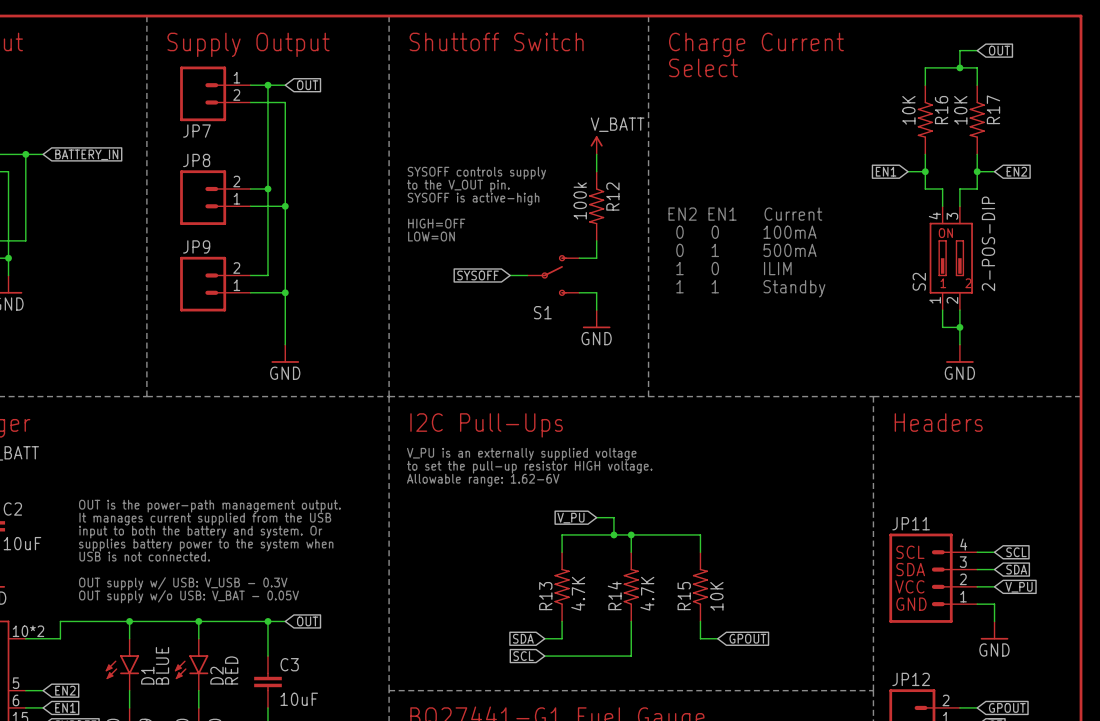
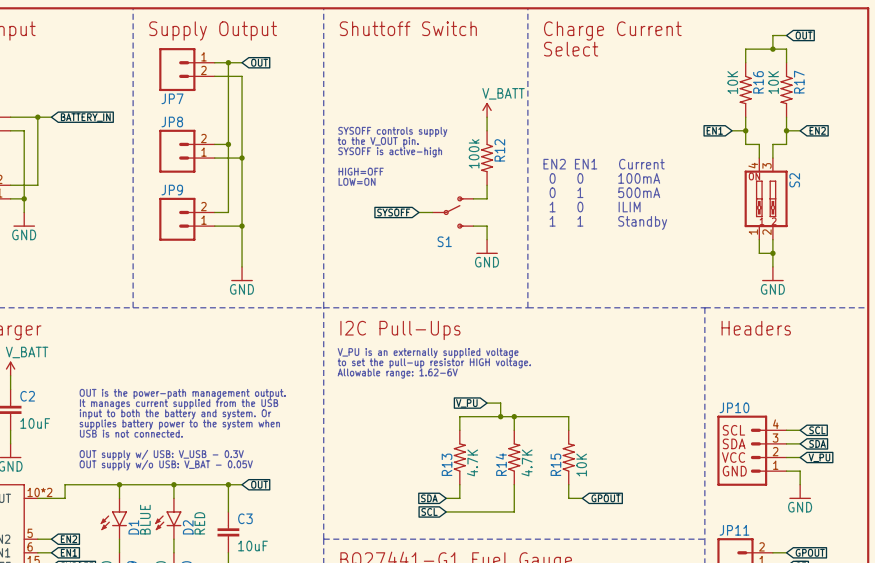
S2 symbol: [929, 206, 973, 311] -> [744, 158, 788, 240]
S2 value: 2-POS-DIP (988, 243) -> none
S2 name position: S2 (919, 281) -> S2 (794, 180)
JP11 name: JP11 (911, 523) -> JP10 (734, 407)
JP12 name: JP12 (911, 679) -> JP11 (734, 530)

